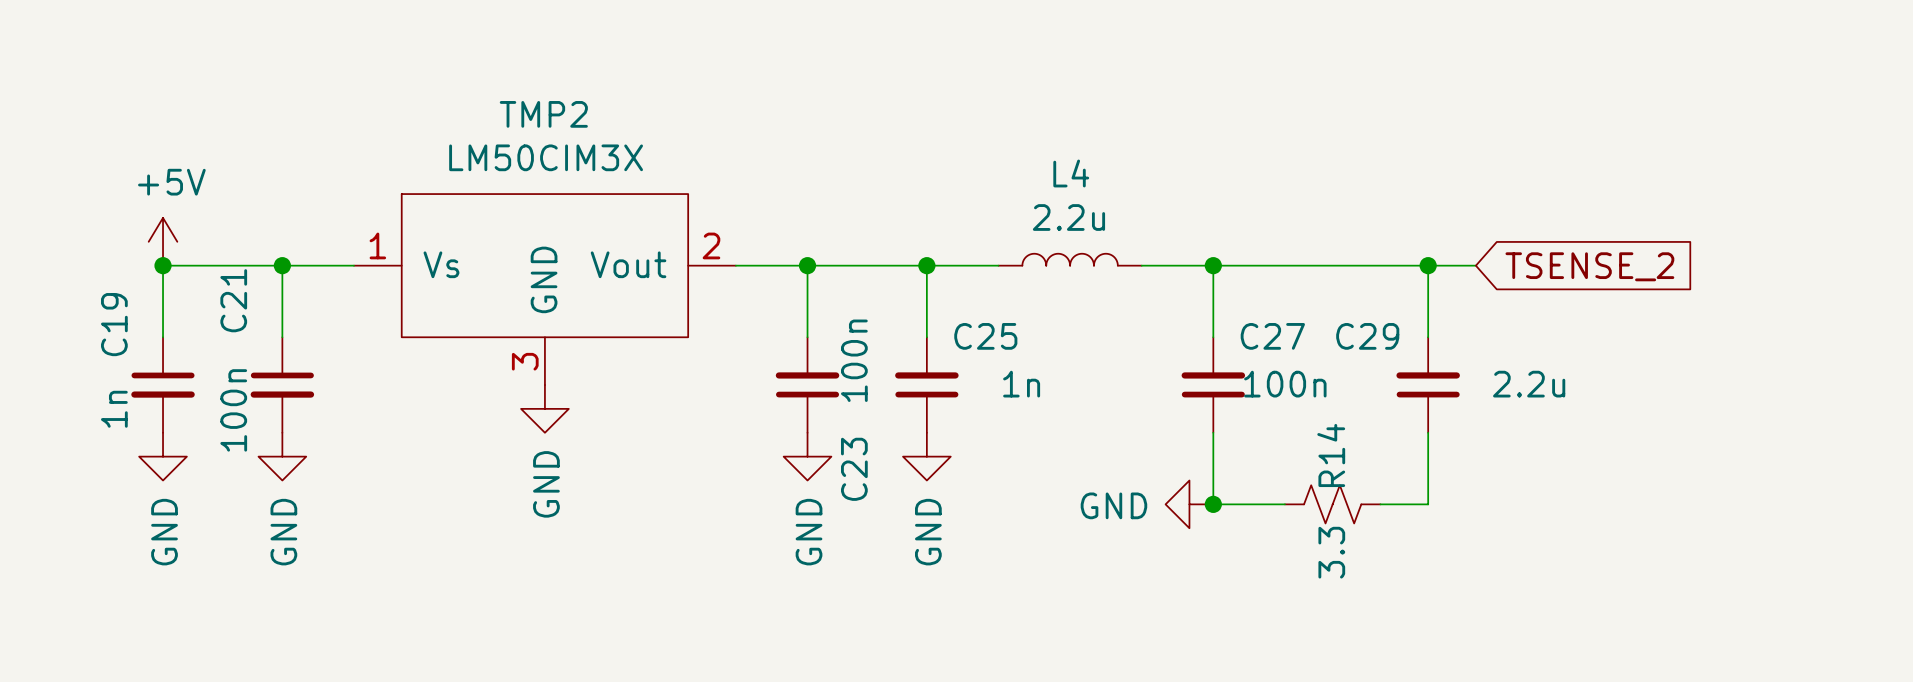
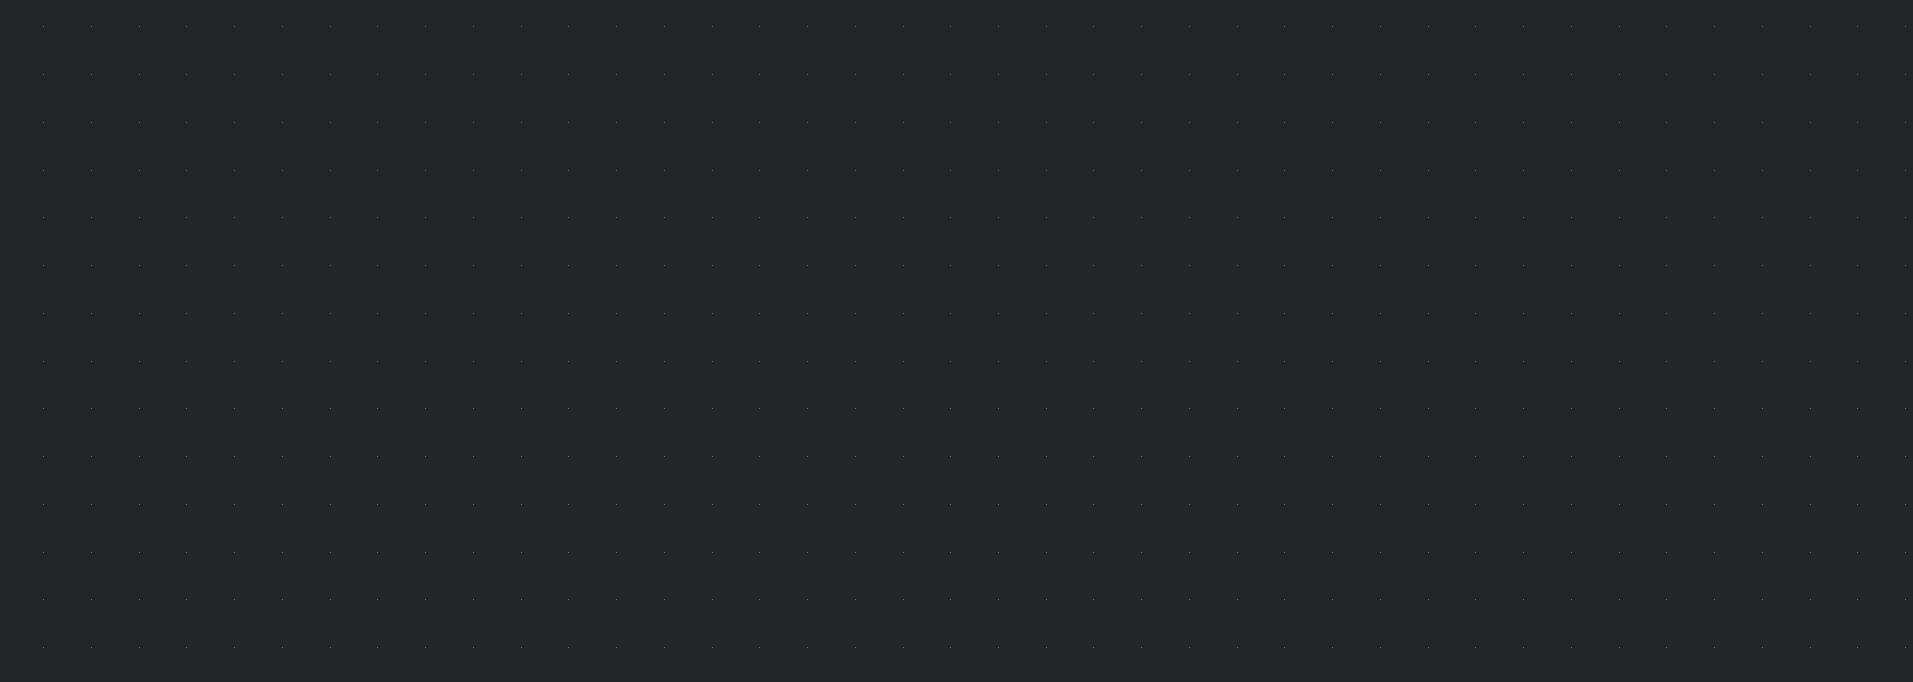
power symbol: +5V (163, 241) -> none
L4: 2.2u (1070, 259) -> none
junction: (163, 265) -> none
wire: (282, 265) (282, 337) -> none
junction: (282, 265) -> none
wire: (353, 265) (163, 265) (163, 337) -> none
wire: (735, 265) (998, 265) -> none
wire: (807, 265) (807, 337) -> none
junction: (807, 265) -> none
wire: (926, 265) (926, 337) -> none
junction: (926, 265) -> none
wire: (1141, 265) (1475, 265) -> none
wire: (1213, 265) (1213, 337) -> none
junction: (1213, 265) -> none
wire: (1428, 265) (1428, 337) -> none
junction: (1428, 265) -> none
global label: TSENSE_2 (1589, 266) -> none
TMP2: LM50CIM3X (544, 289) -> none
C19: 1n (163, 385) -> none
C21: 100n (282, 385) -> none
C23: 100n (807, 385) -> none
C25: 1n (926, 385) -> none
C27: 100n (1213, 385) -> none
C29: 2.2u (1428, 385) -> none
power symbol: GND (544, 408) -> none
wire: (1213, 432) (1213, 504) (1284, 504) -> none
wire: (1428, 432) (1428, 504) (1380, 504) -> none
power symbol: GND (163, 456) -> none
power symbol: GND (282, 456) -> none
power symbol: GND (807, 456) -> none
power symbol: GND (926, 456) -> none
power symbol: GND (1189, 504) -> none
junction: (1213, 504) -> none
R14: 3.3 (1332, 504) -> none

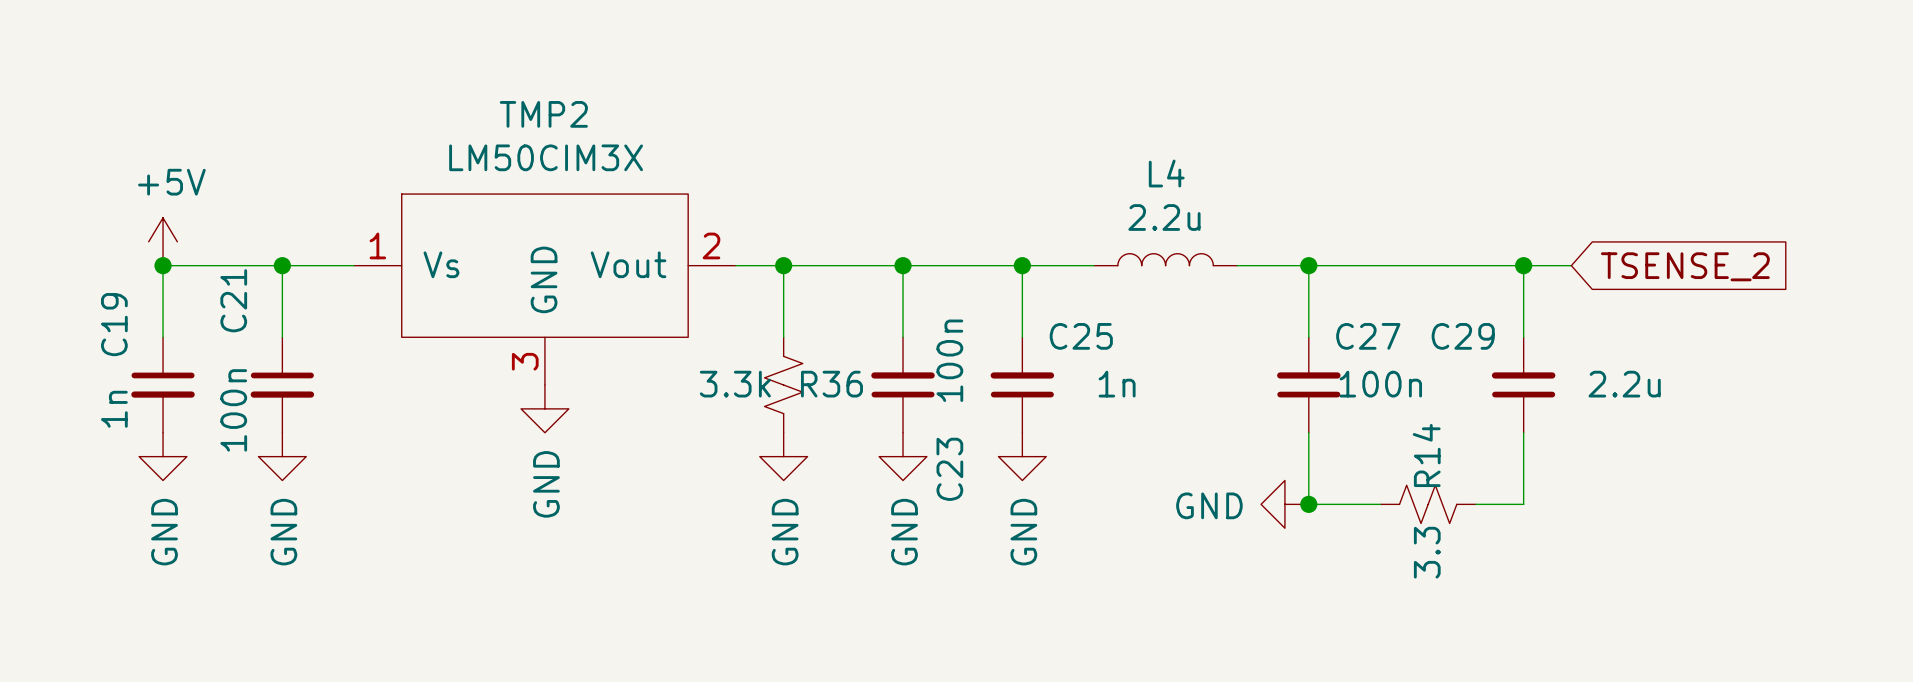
power symbol: none -> +5V (163, 241)
L4: none -> 2.2u (1165, 259)
junction: none -> (163, 265)
wire: none -> (282, 265) (282, 337)
junction: none -> (282, 265)
wire: none -> (353, 265) (163, 265) (163, 337)
wire: none -> (735, 265) (1093, 265)
wire: none -> (783, 265) (783, 337)
junction: none -> (783, 265)
wire: none -> (903, 265) (903, 337)
junction: none -> (903, 265)
wire: none -> (1022, 265) (1022, 337)
junction: none -> (1022, 265)
wire: none -> (1237, 265) (1571, 265)
wire: none -> (1308, 265) (1308, 337)
junction: none -> (1308, 265)
wire: none -> (1523, 265) (1523, 337)
junction: none -> (1523, 265)
global label: none -> TSENSE_2 (1685, 266)
TMP2: none -> LM50CIM3X (544, 289)
C19: none -> 1n (163, 385)
C21: none -> 100n (282, 385)
R36: none -> 3.3k (783, 385)
C23: none -> 100n (903, 385)
C25: none -> 1n (1022, 385)
C27: none -> 100n (1308, 385)
C29: none -> 2.2u (1523, 385)
power symbol: none -> GND (544, 408)
wire: none -> (1308, 432) (1308, 504) (1380, 504)
wire: none -> (1523, 432) (1523, 504) (1475, 504)
power symbol: none -> GND (163, 456)
power symbol: none -> GND (282, 456)
power symbol: none -> GND (783, 456)
power symbol: none -> GND (903, 456)
power symbol: none -> GND (1022, 456)
power symbol: none -> GND (1284, 504)
junction: none -> (1308, 504)
R14: none -> 3.3 (1428, 504)

